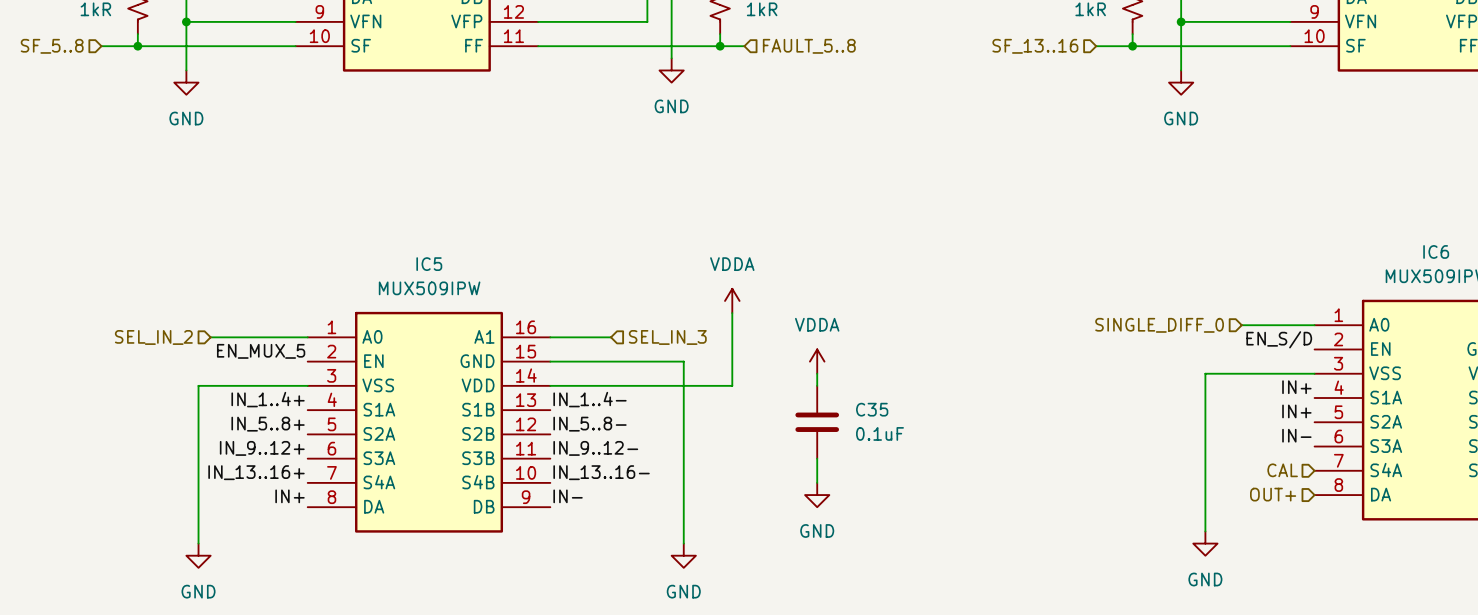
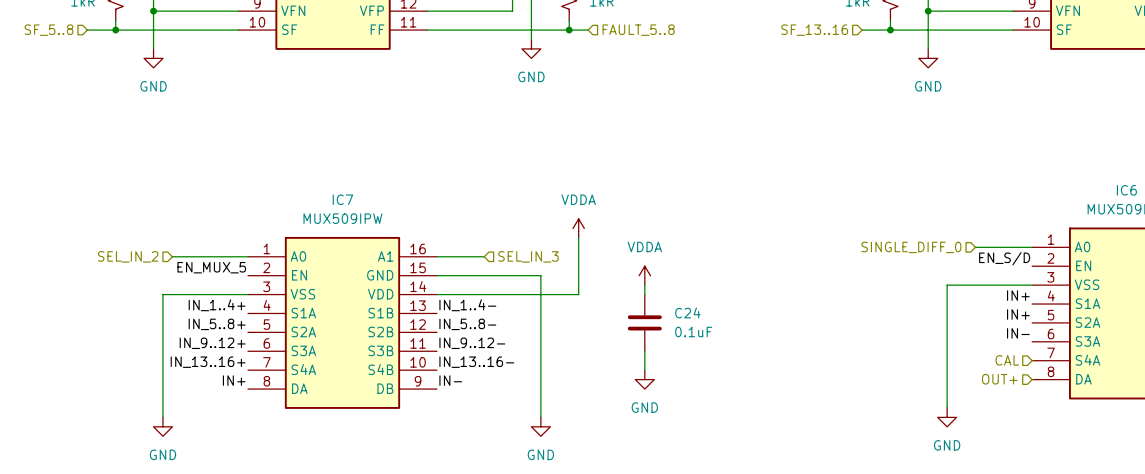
IC5 name: IC5 (429, 264) -> IC7 (342, 199)
C35 name: C35 (872, 409) -> C24 (687, 312)

